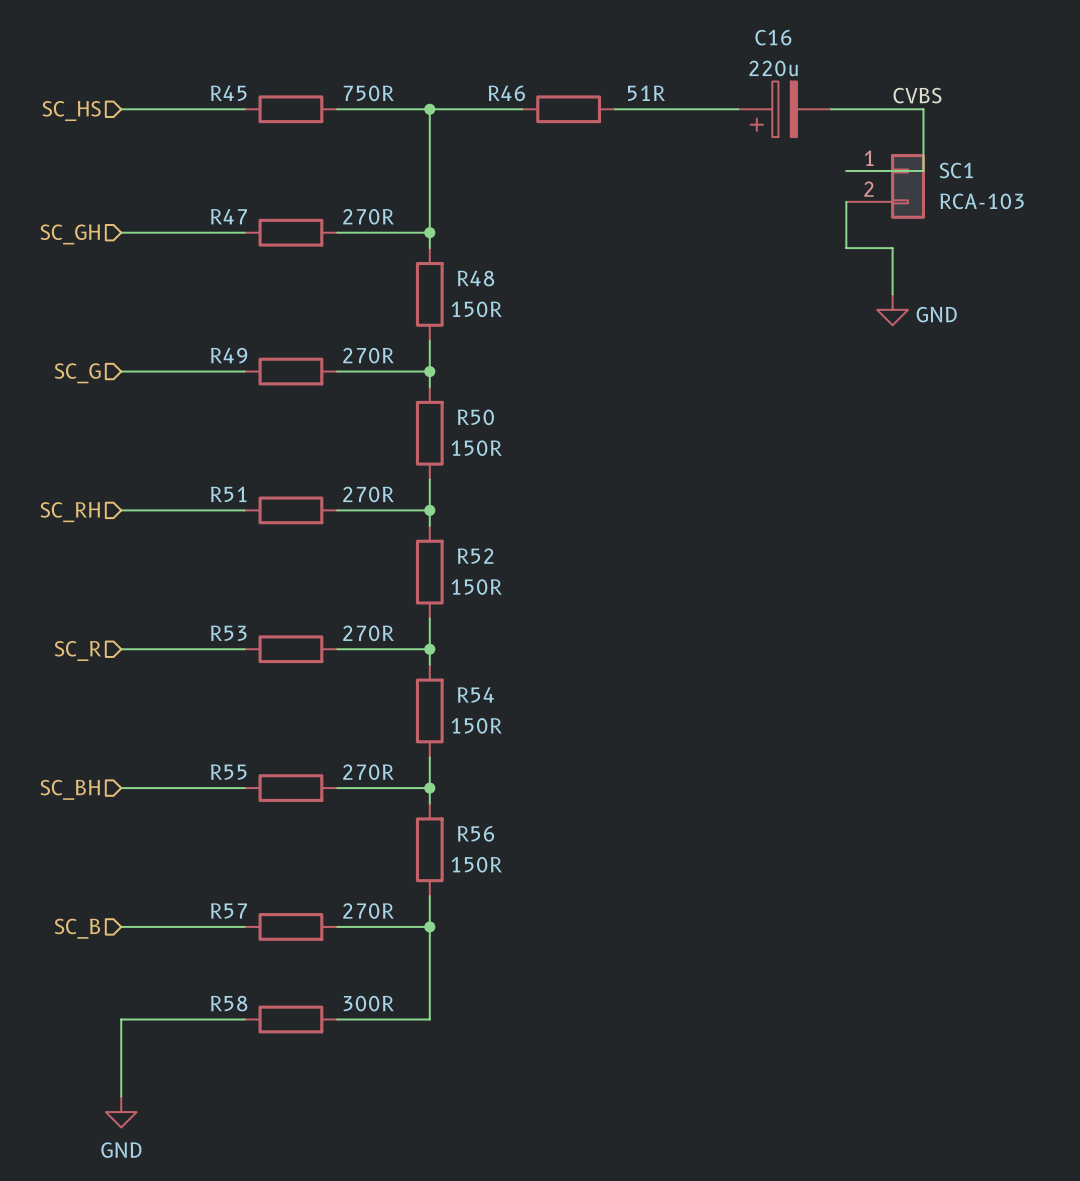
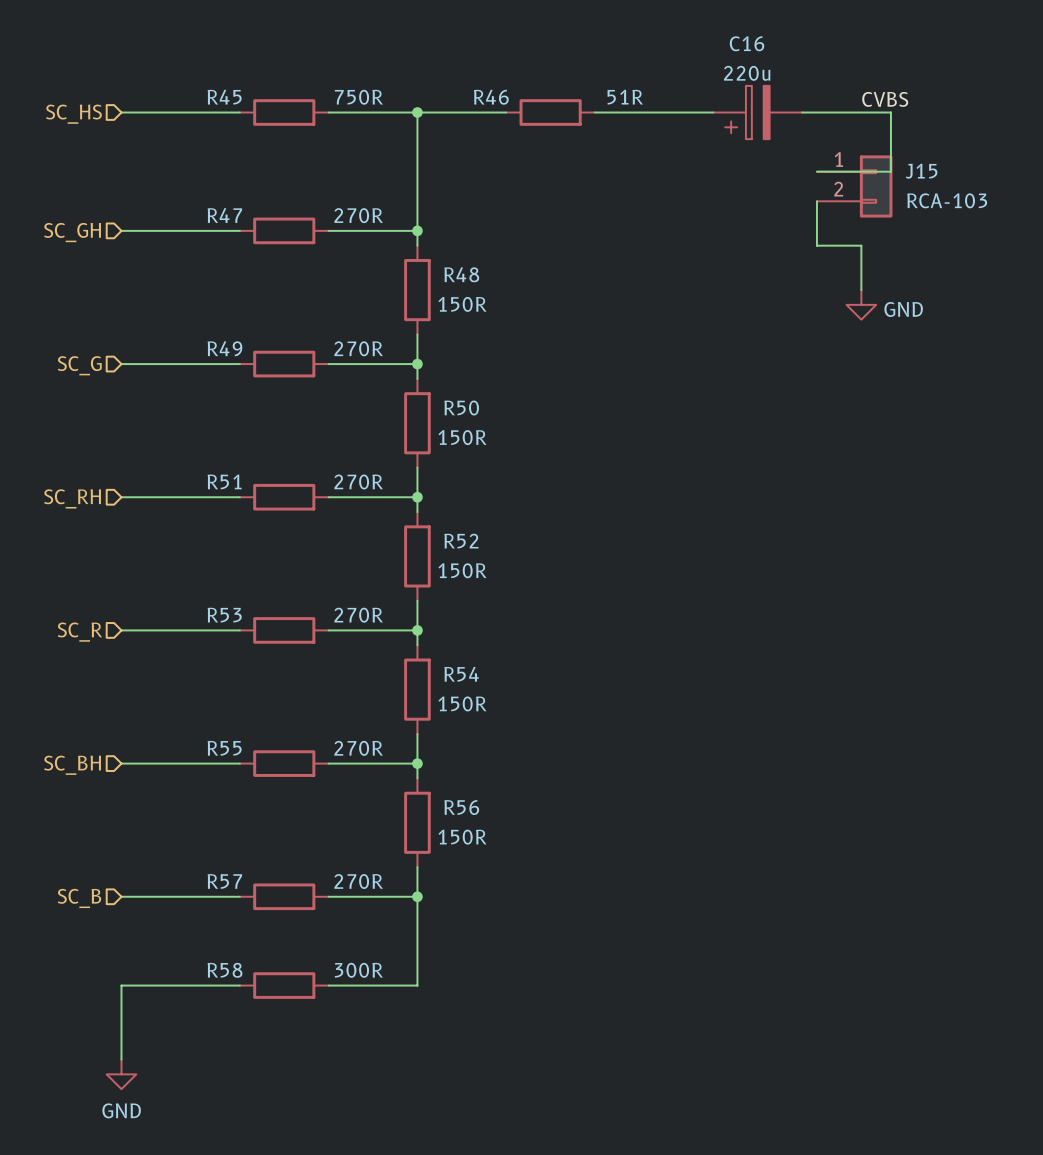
SC1 name: SC1 (956, 170) -> J15 (921, 171)

